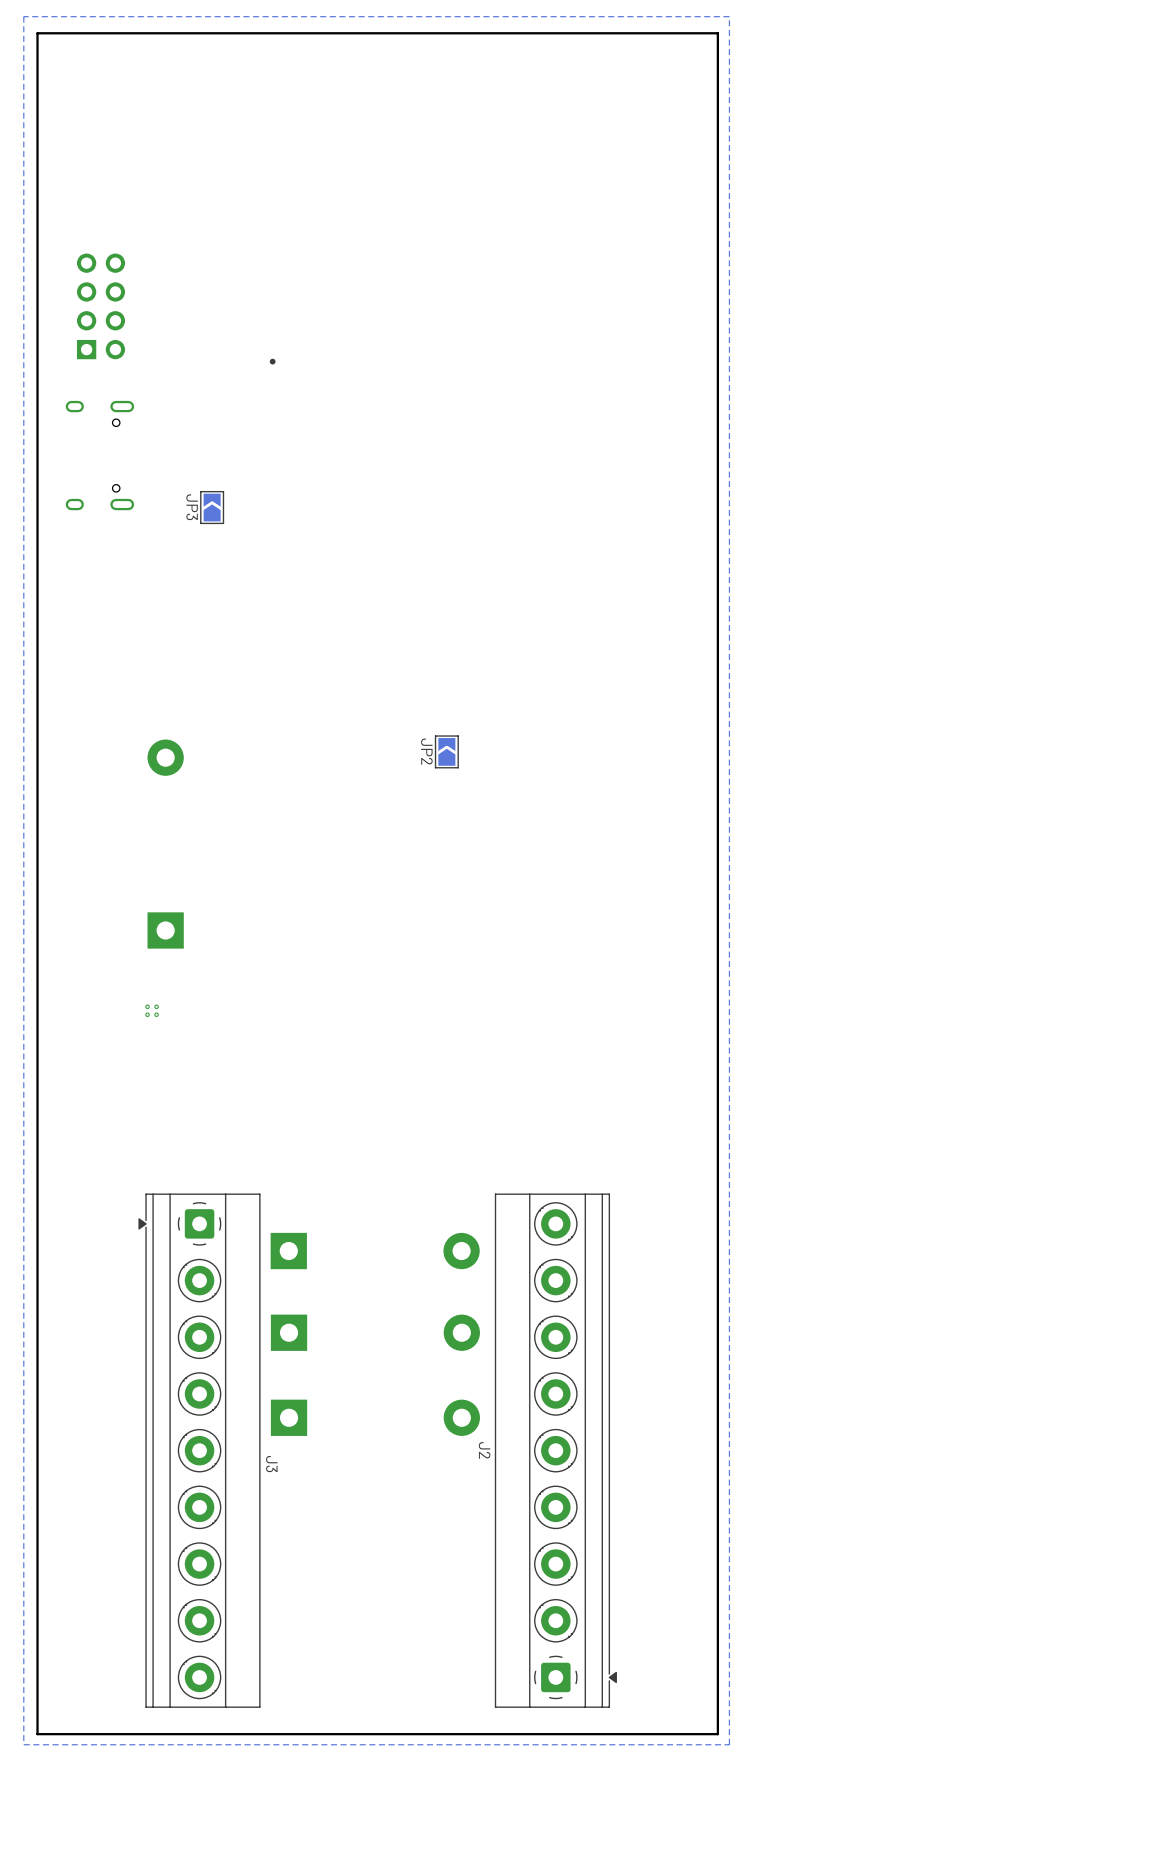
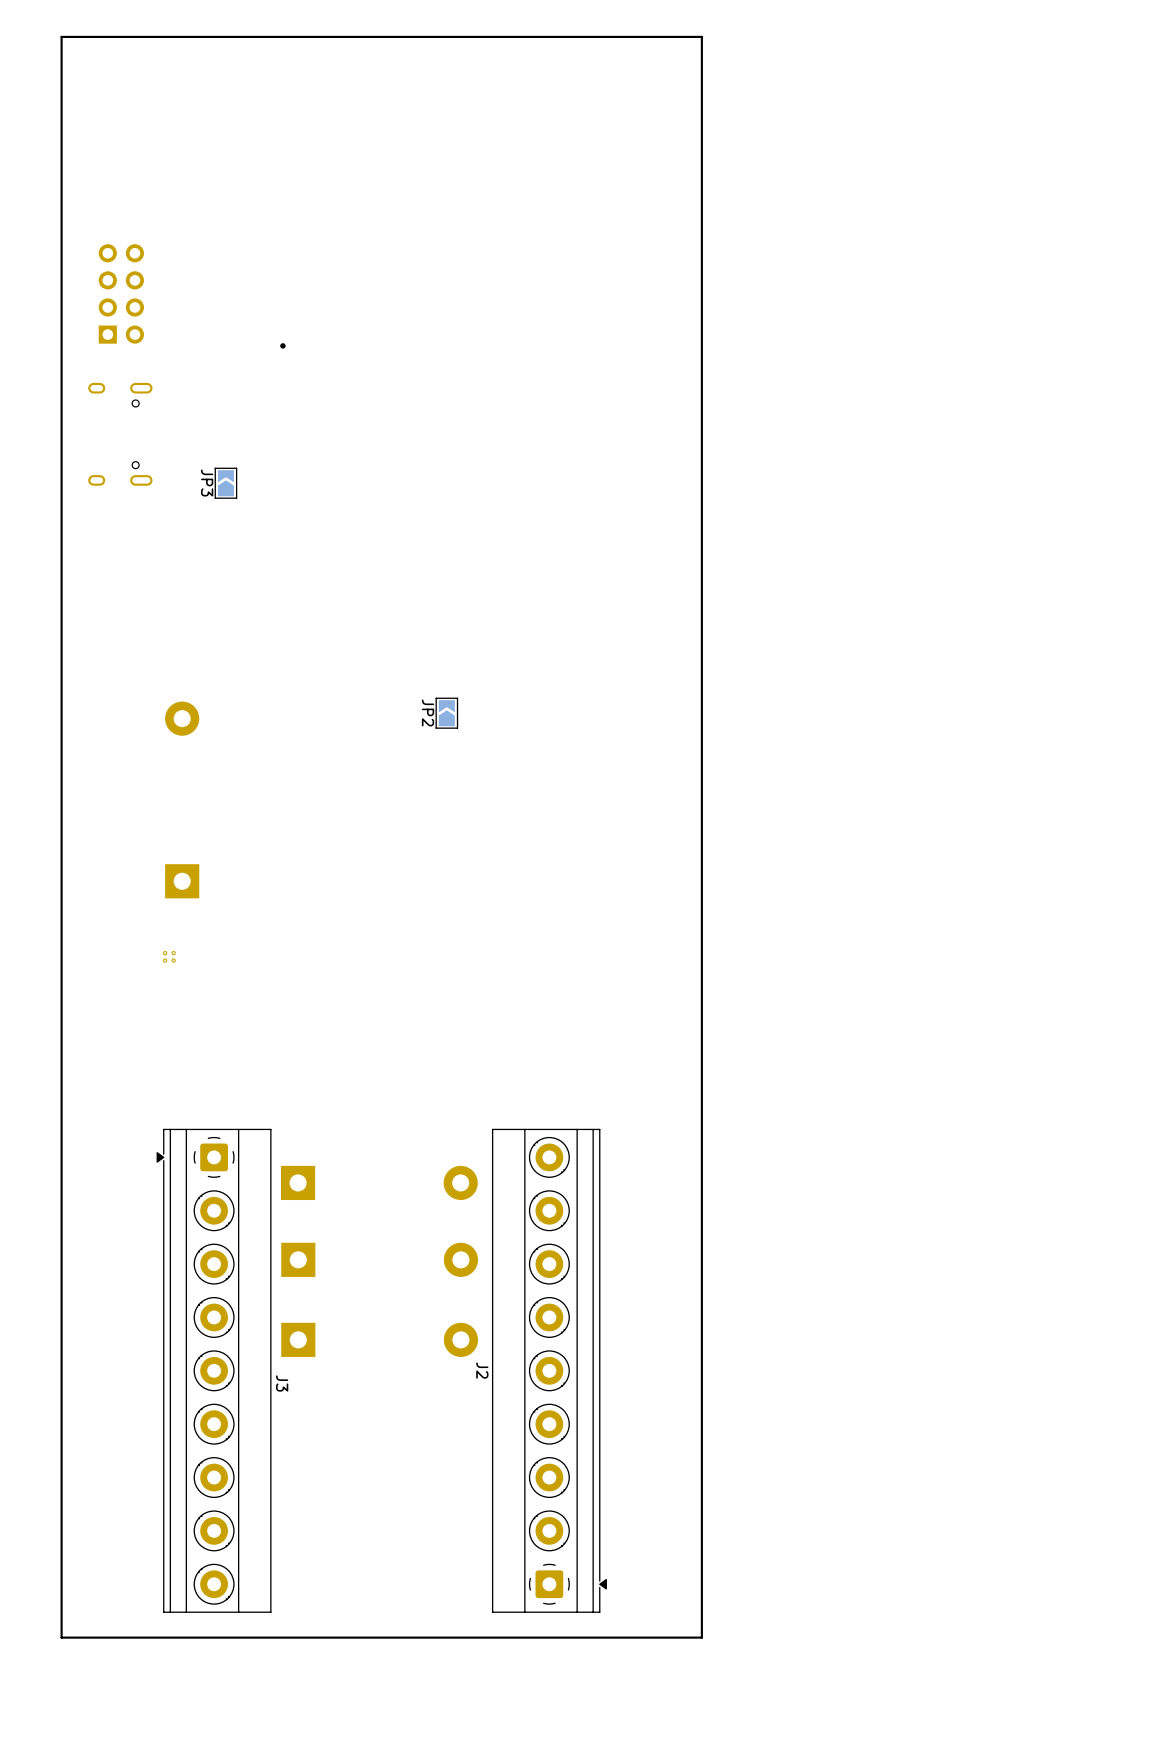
zone outline: (729, 16) (23, 16) (23, 1744) (729, 1744) (729, 16) -> none

